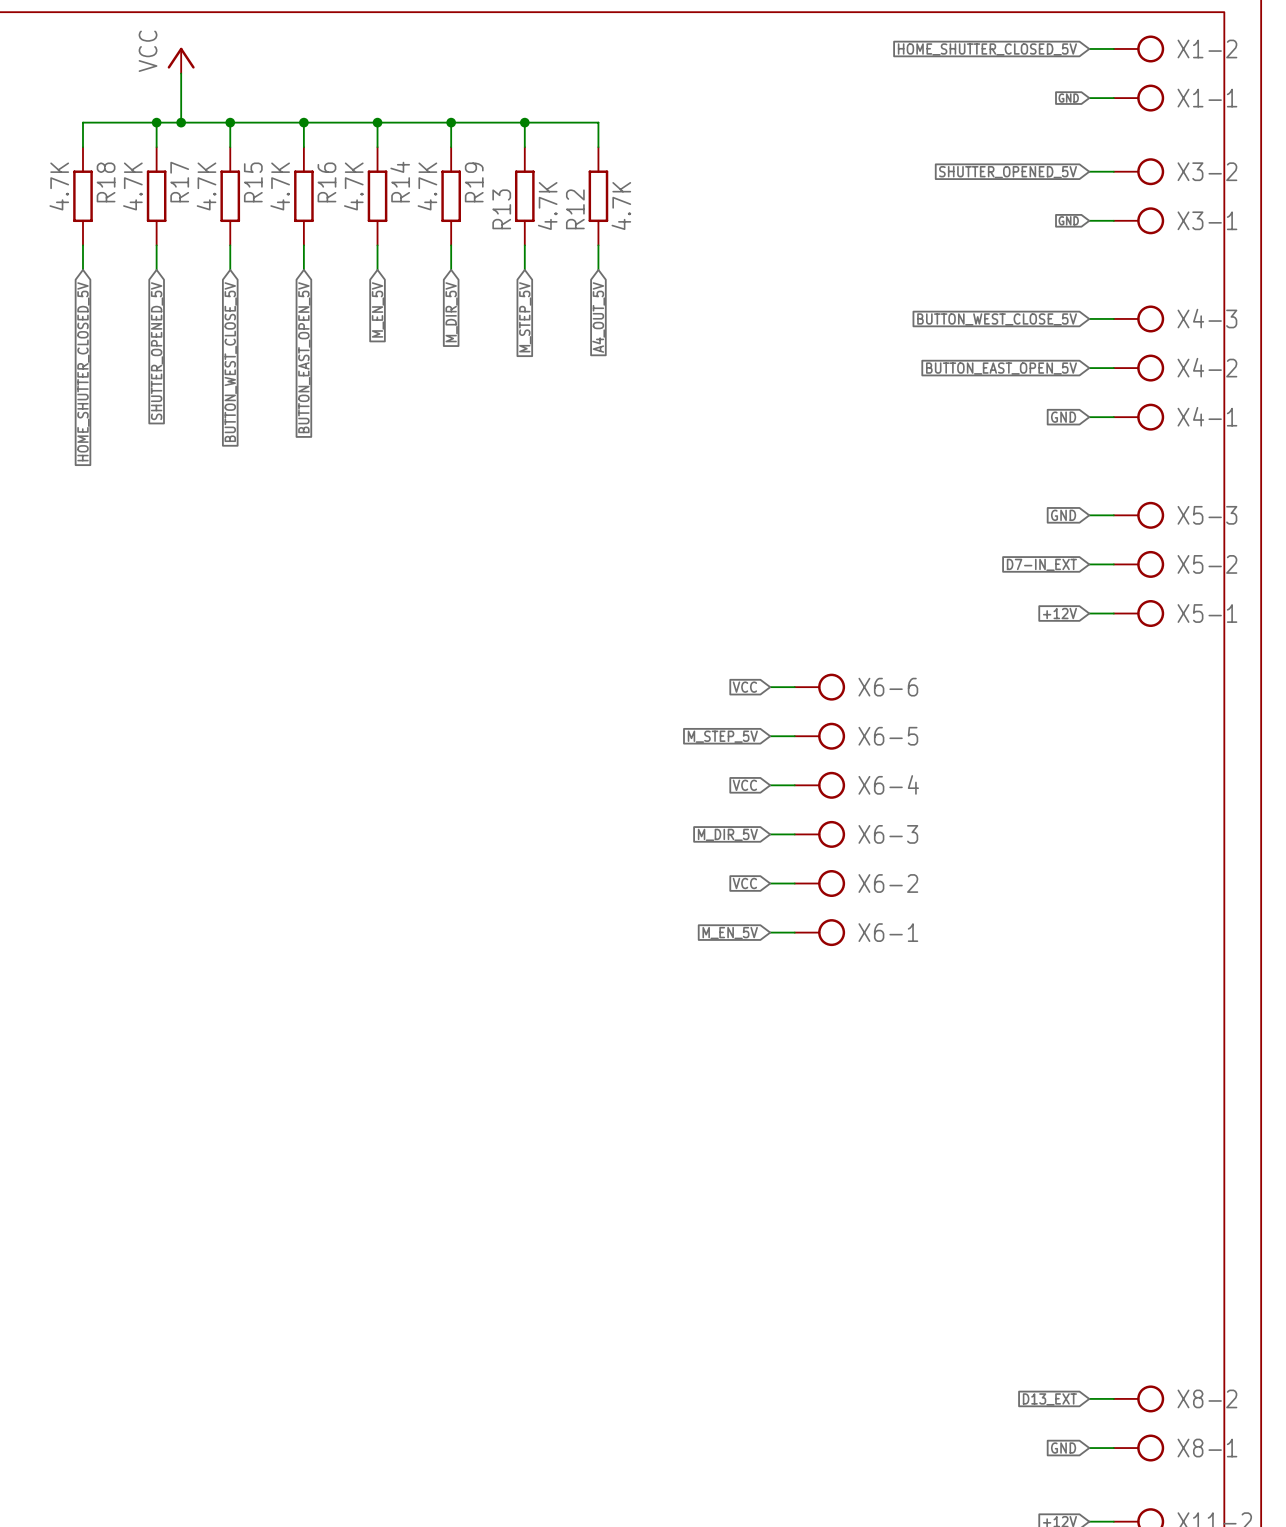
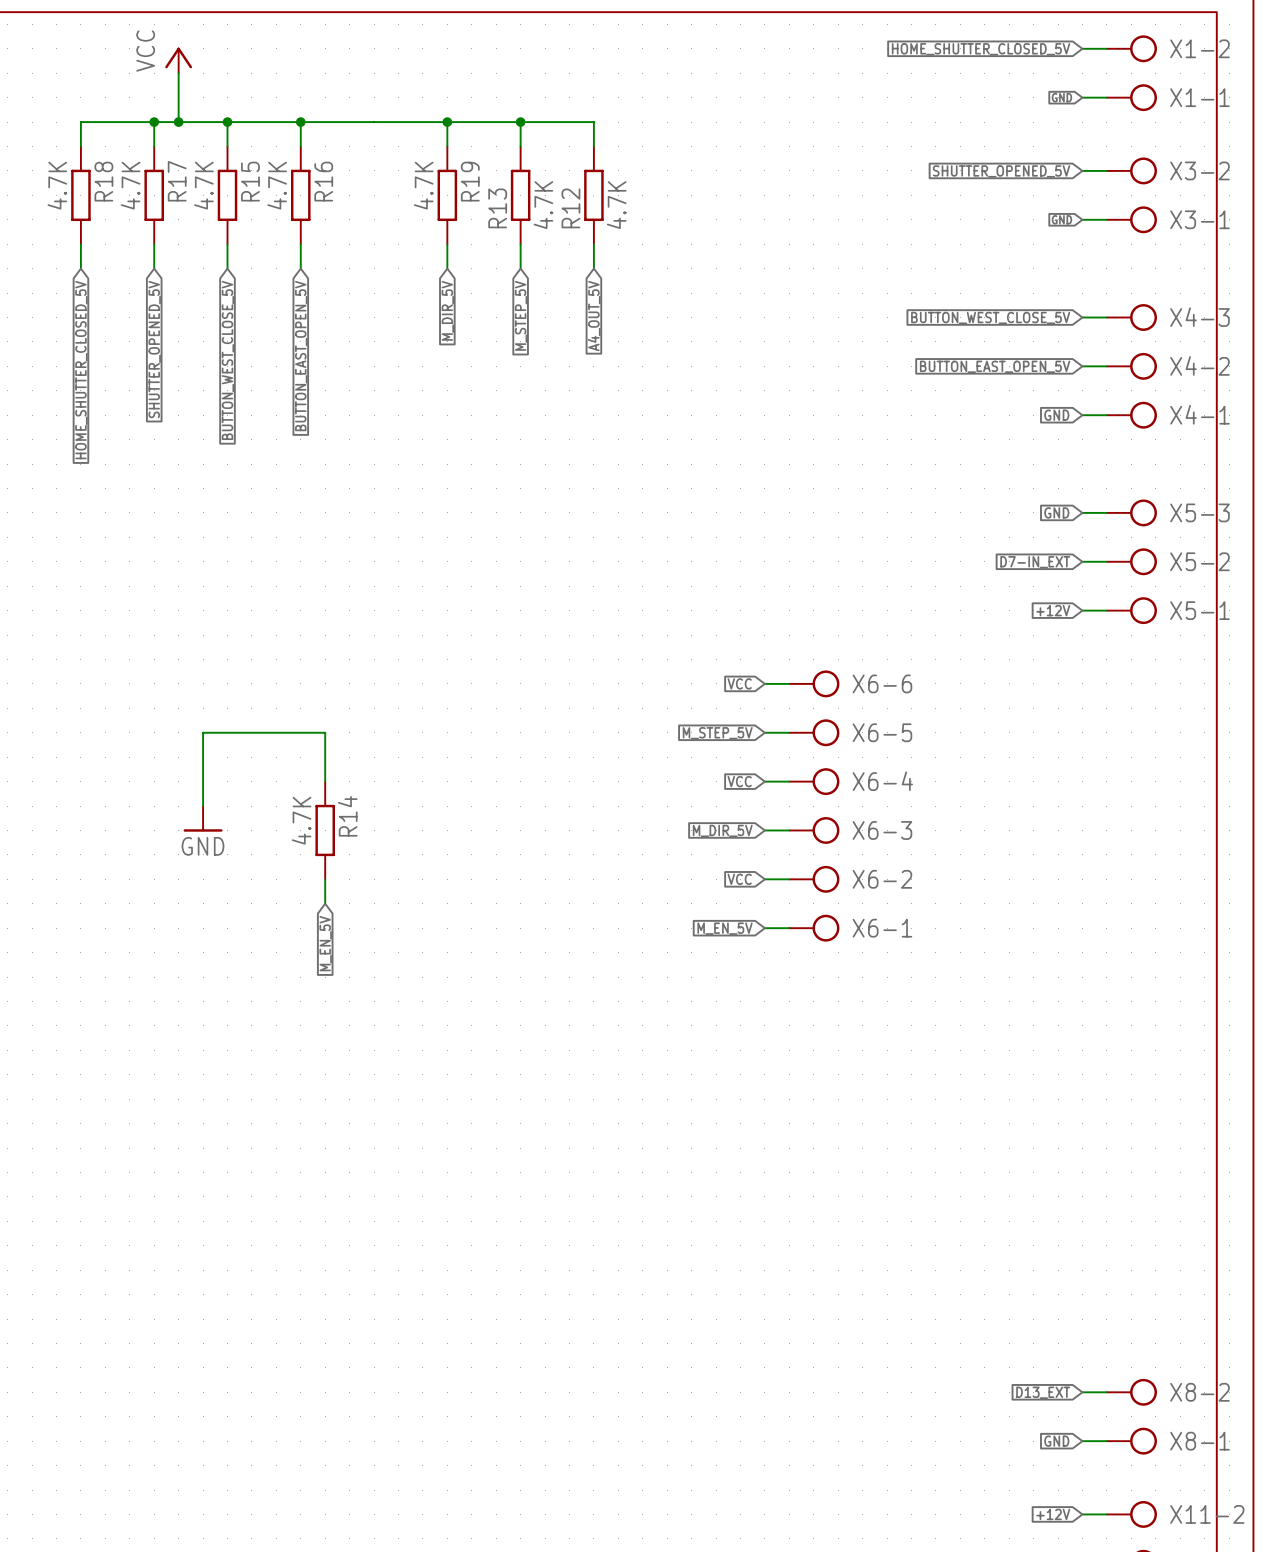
wire: (377, 122) (377, 147) -> none
junction: (377, 122) -> none
R14 position: (377, 196) -> (325, 830)
wire: (377, 245) (377, 269) -> none
global label: M_EN_5V (377, 309) -> none
wire: none -> (325, 781) (325, 732) (203, 732) (203, 806)
power symbol: none -> GND (203, 818)
wire: none -> (325, 879) (325, 903)
global label: none -> M_EN_5V (325, 943)

